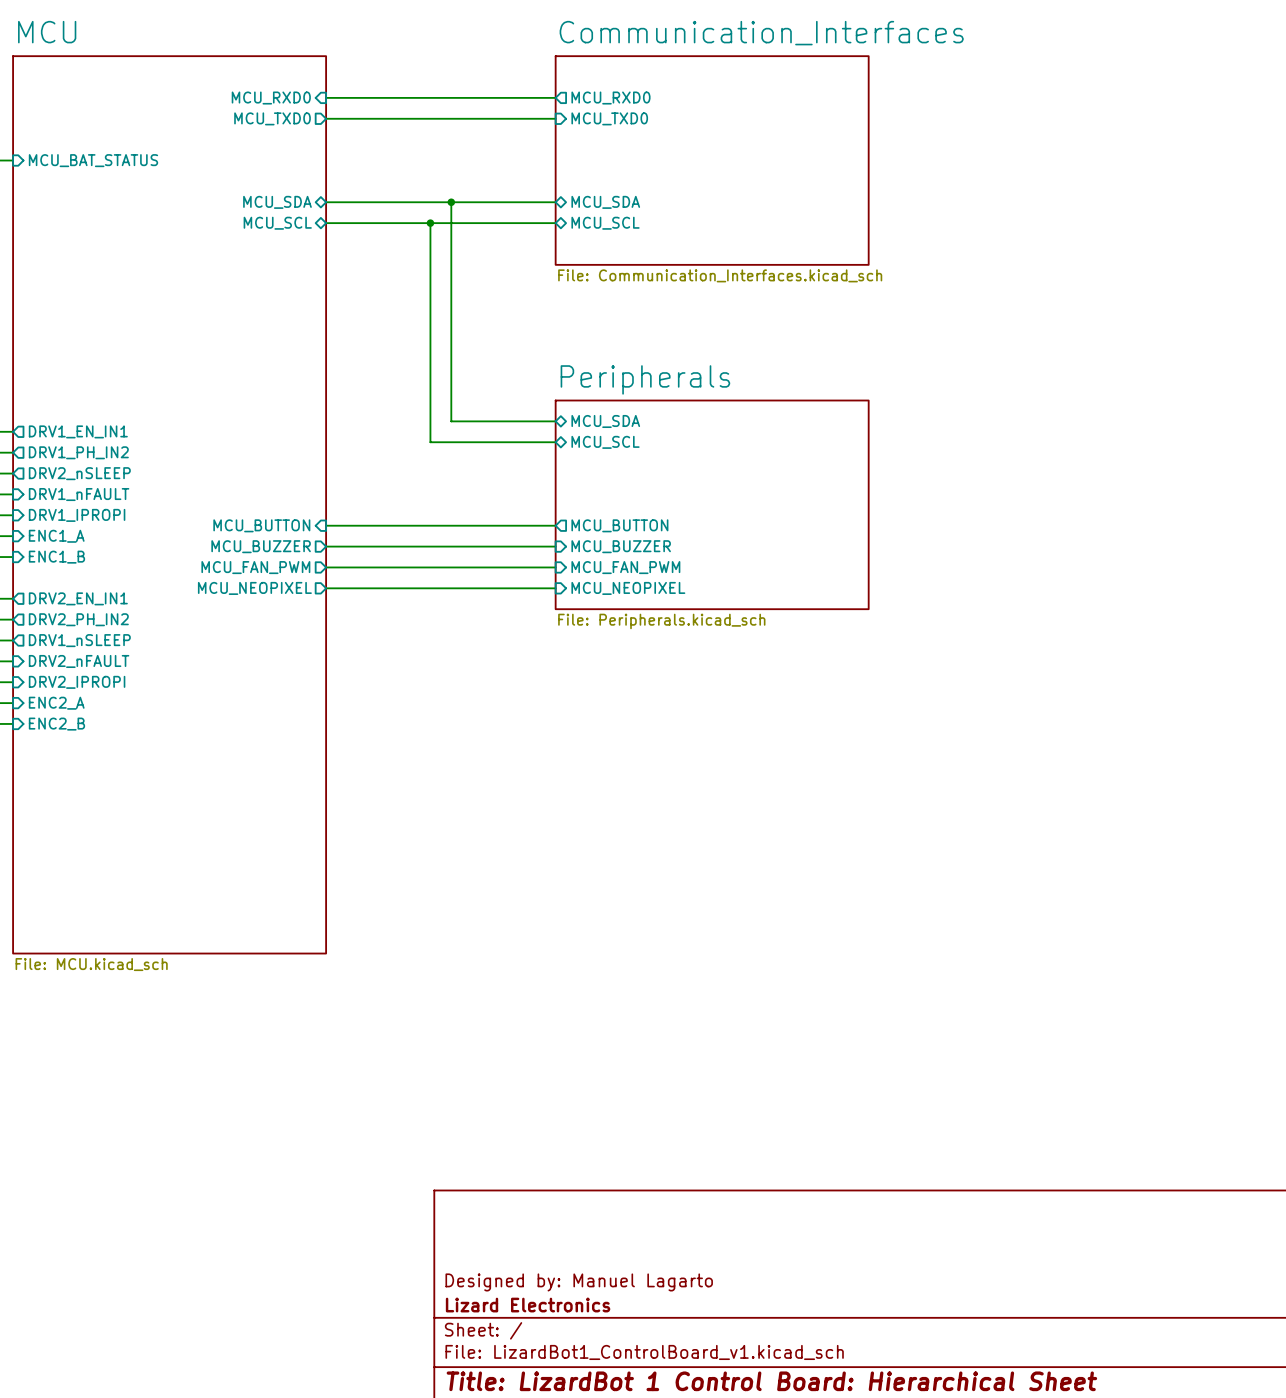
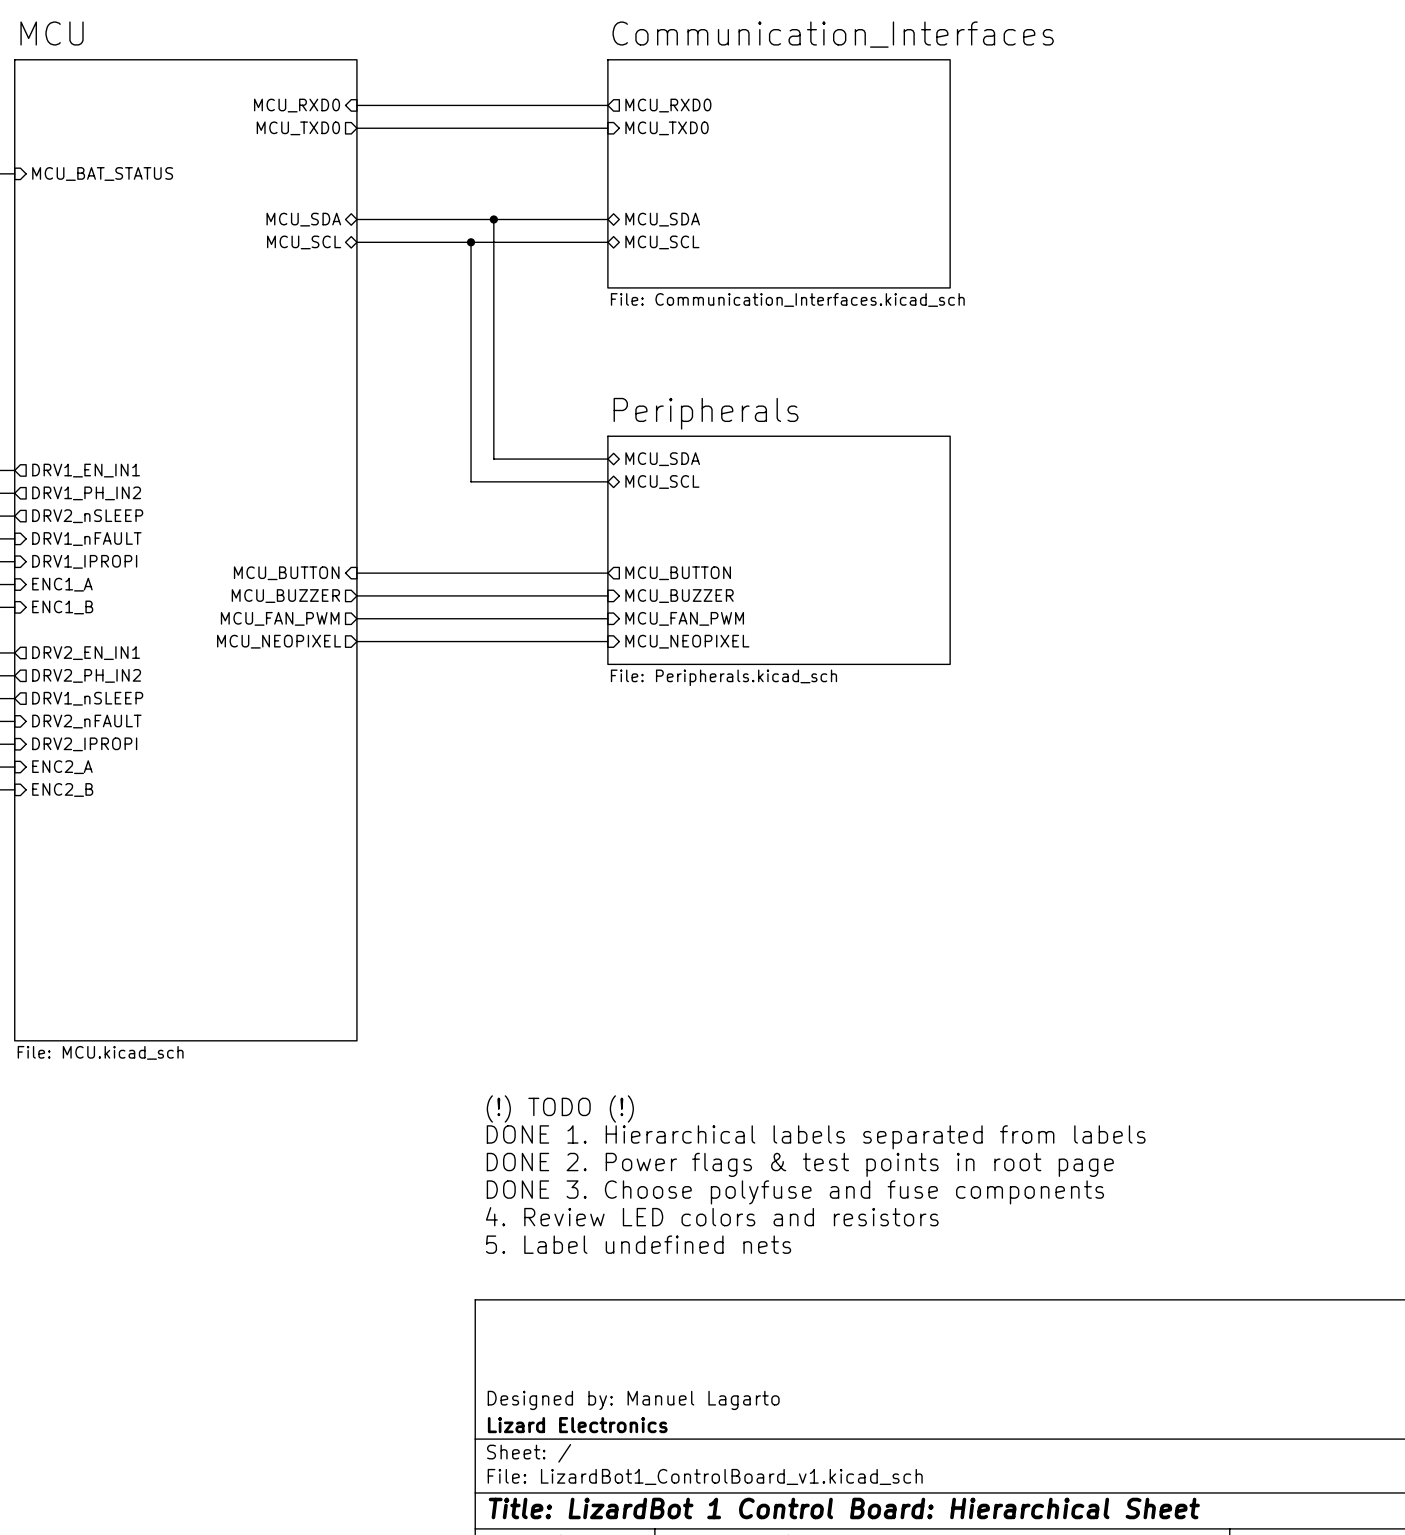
text: none -> (!) TODO (!) (560, 1108)
text: none -> DONE 1. Hierarchical labels separated from labels (816, 1137)
text: none -> DONE 2. Power flags & test points in root page (800, 1164)
text: none -> DONE 3. Choose polyfuse and fuse components (795, 1192)
text: none -> 4. Review LED colors and resistors (712, 1216)
text: none -> 5. Label undefined nets (638, 1244)

